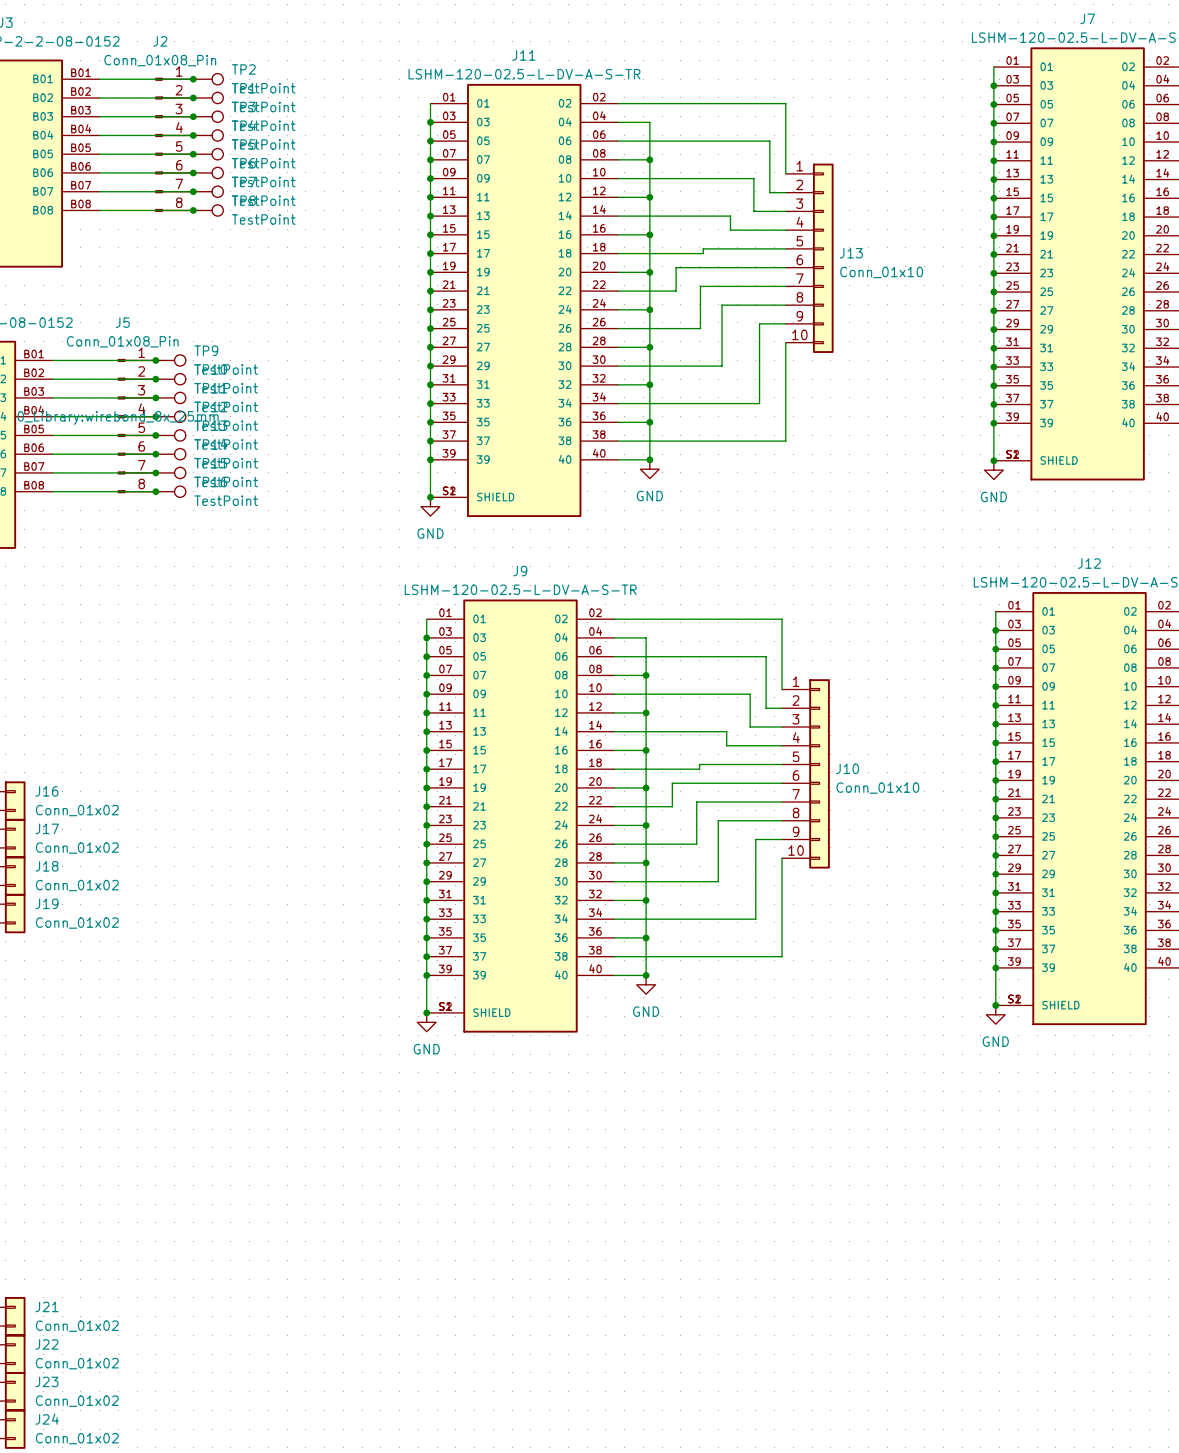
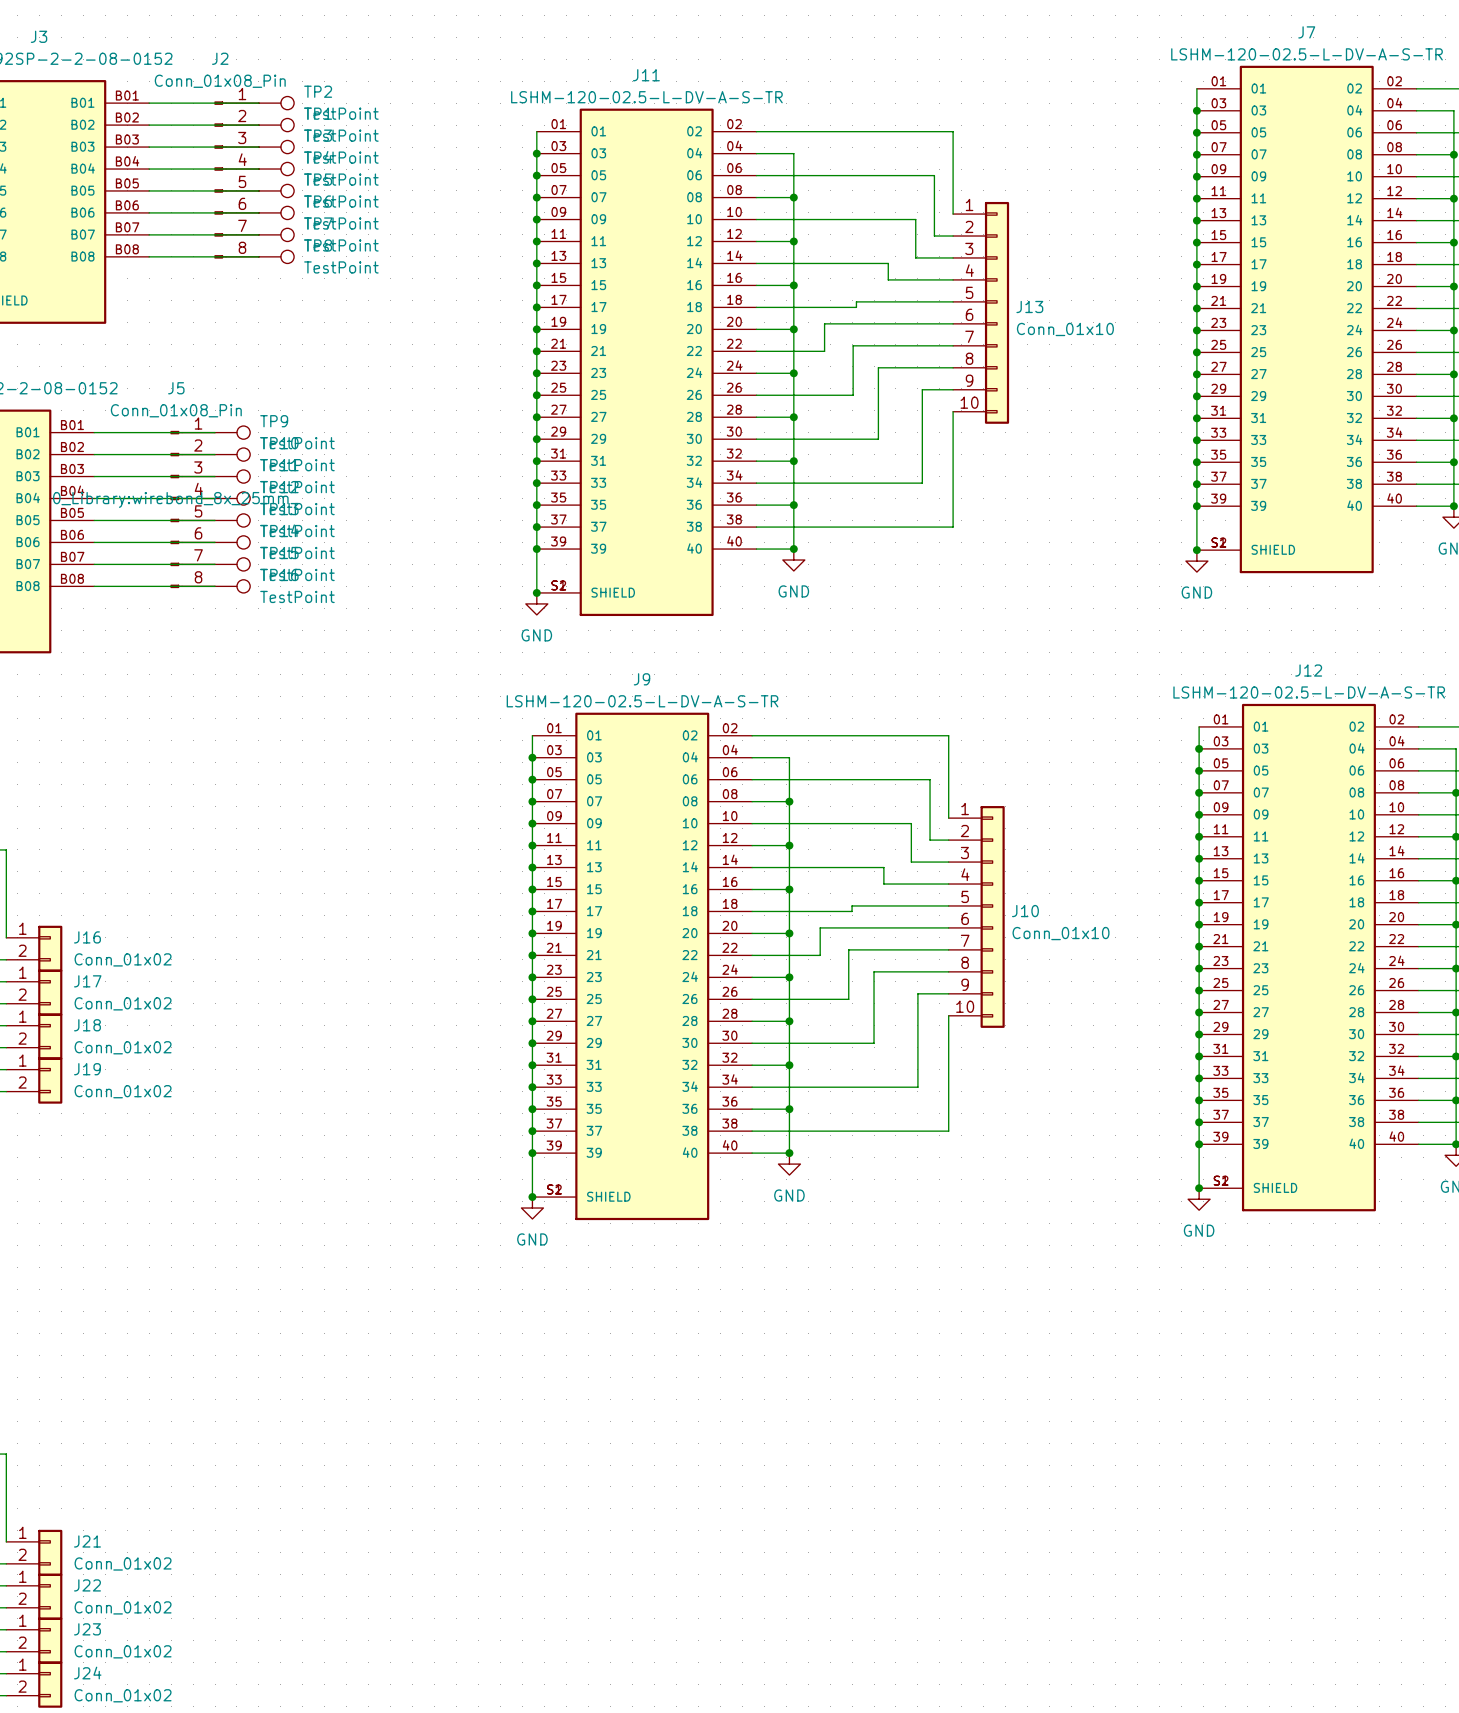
junction: (193, 79) -> none
junction: (193, 97) -> none
junction: (193, 116) -> none
junction: (193, 135) -> none
junction: (193, 154) -> none
junction: (193, 172) -> none
junction: (193, 191) -> none
junction: (193, 210) -> none
junction: (155, 360) -> none
junction: (155, 379) -> none
junction: (155, 397) -> none
junction: (155, 416) -> none
junction: (155, 435) -> none
junction: (155, 454) -> none
junction: (155, 472) -> none
junction: (155, 491) -> none

